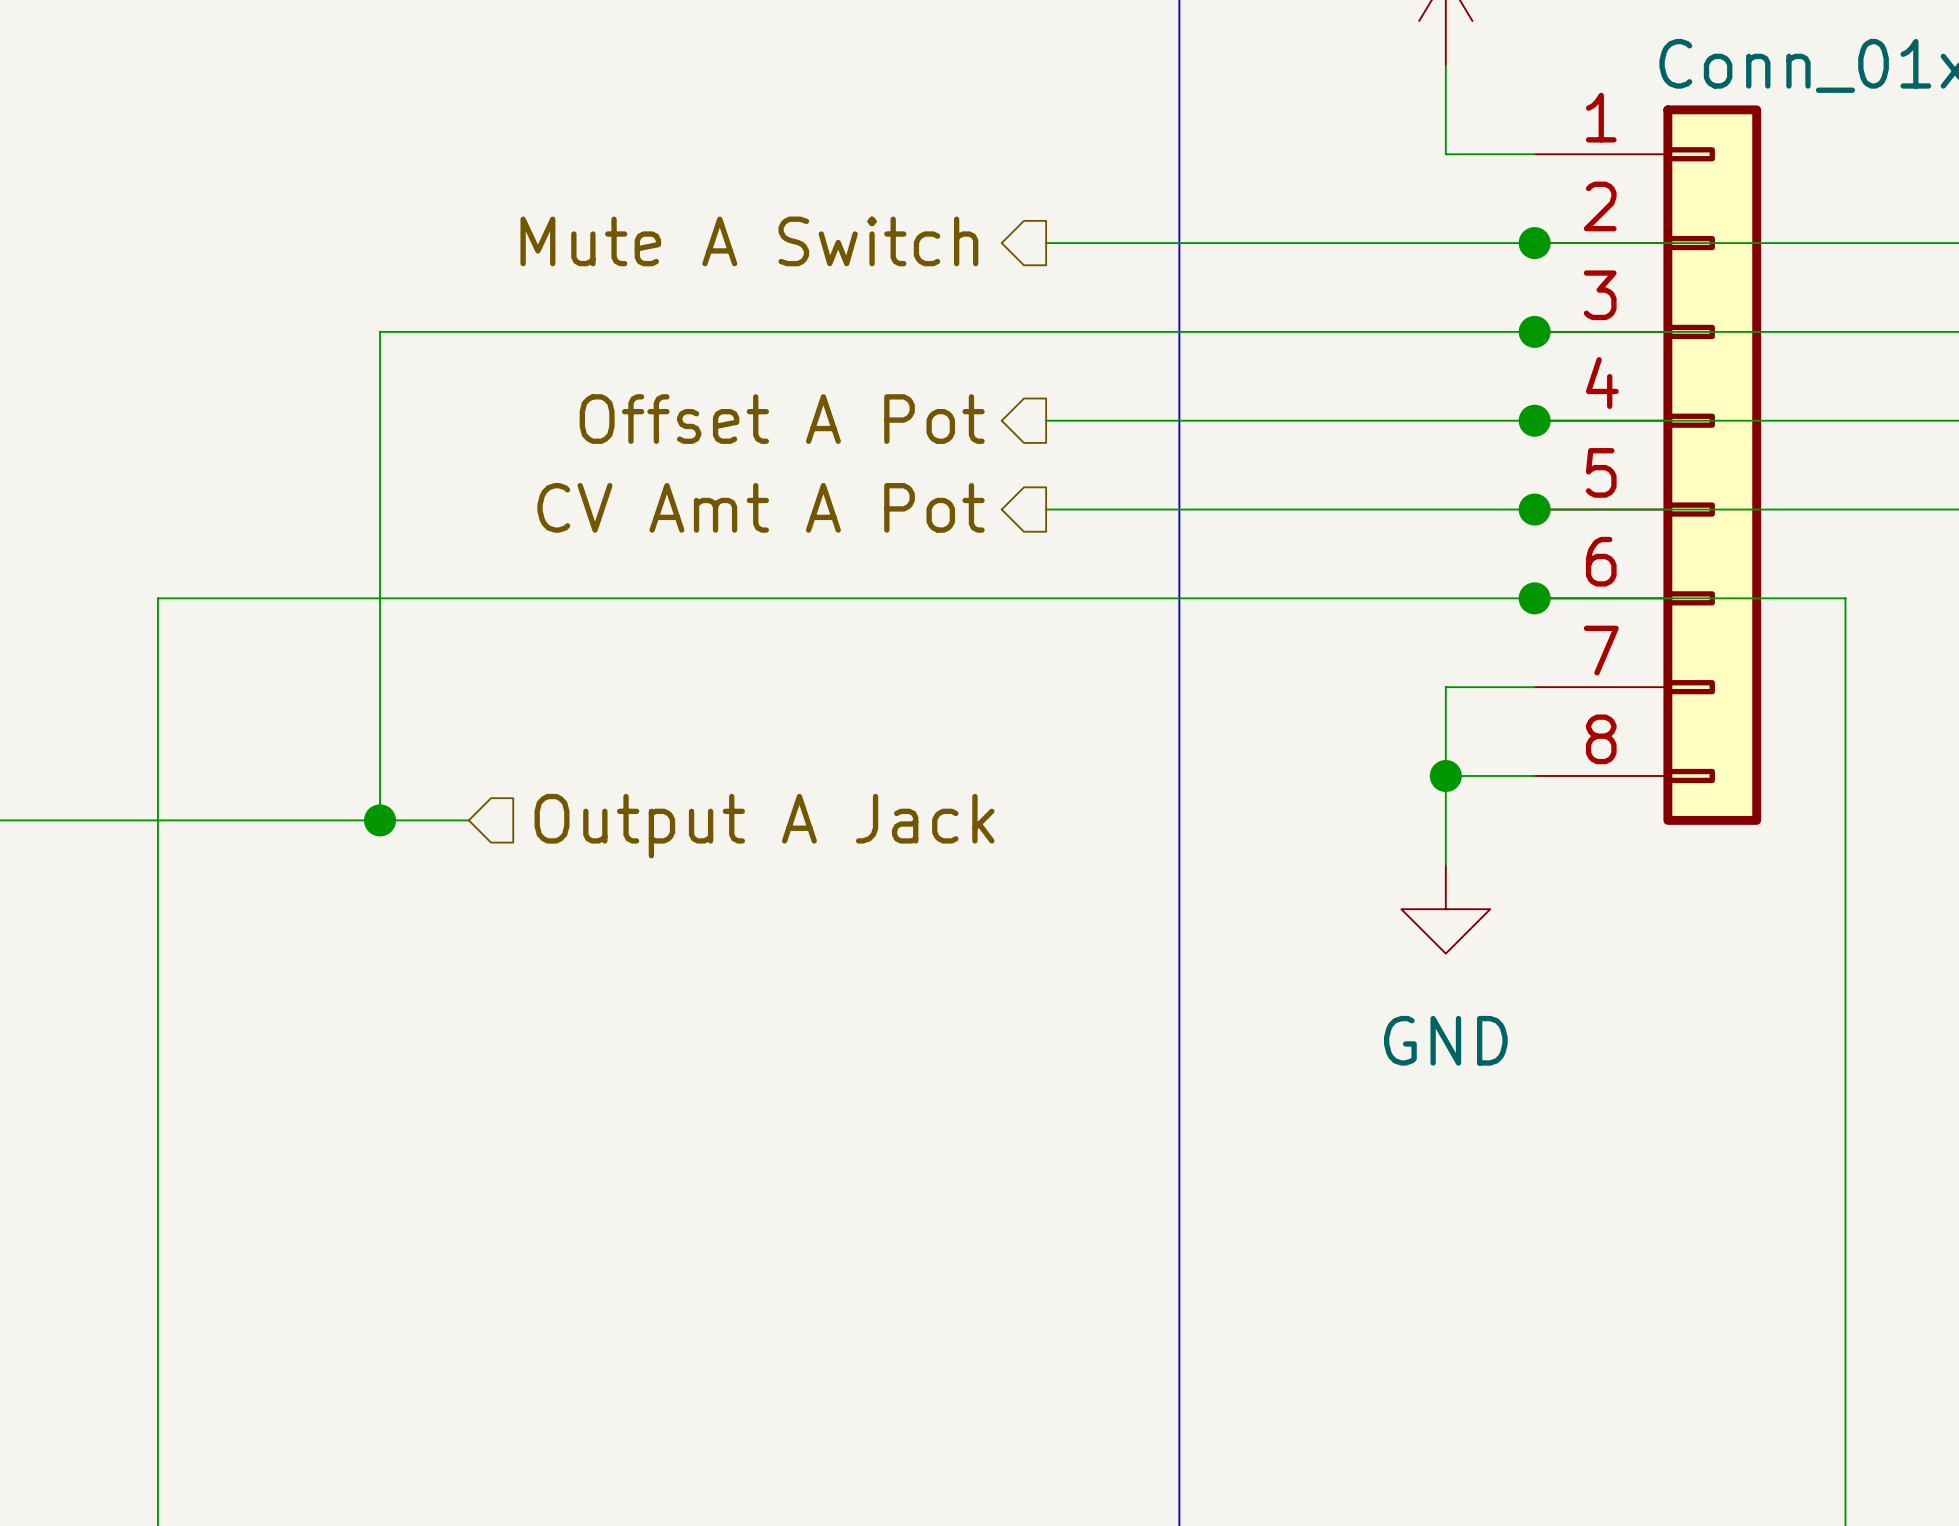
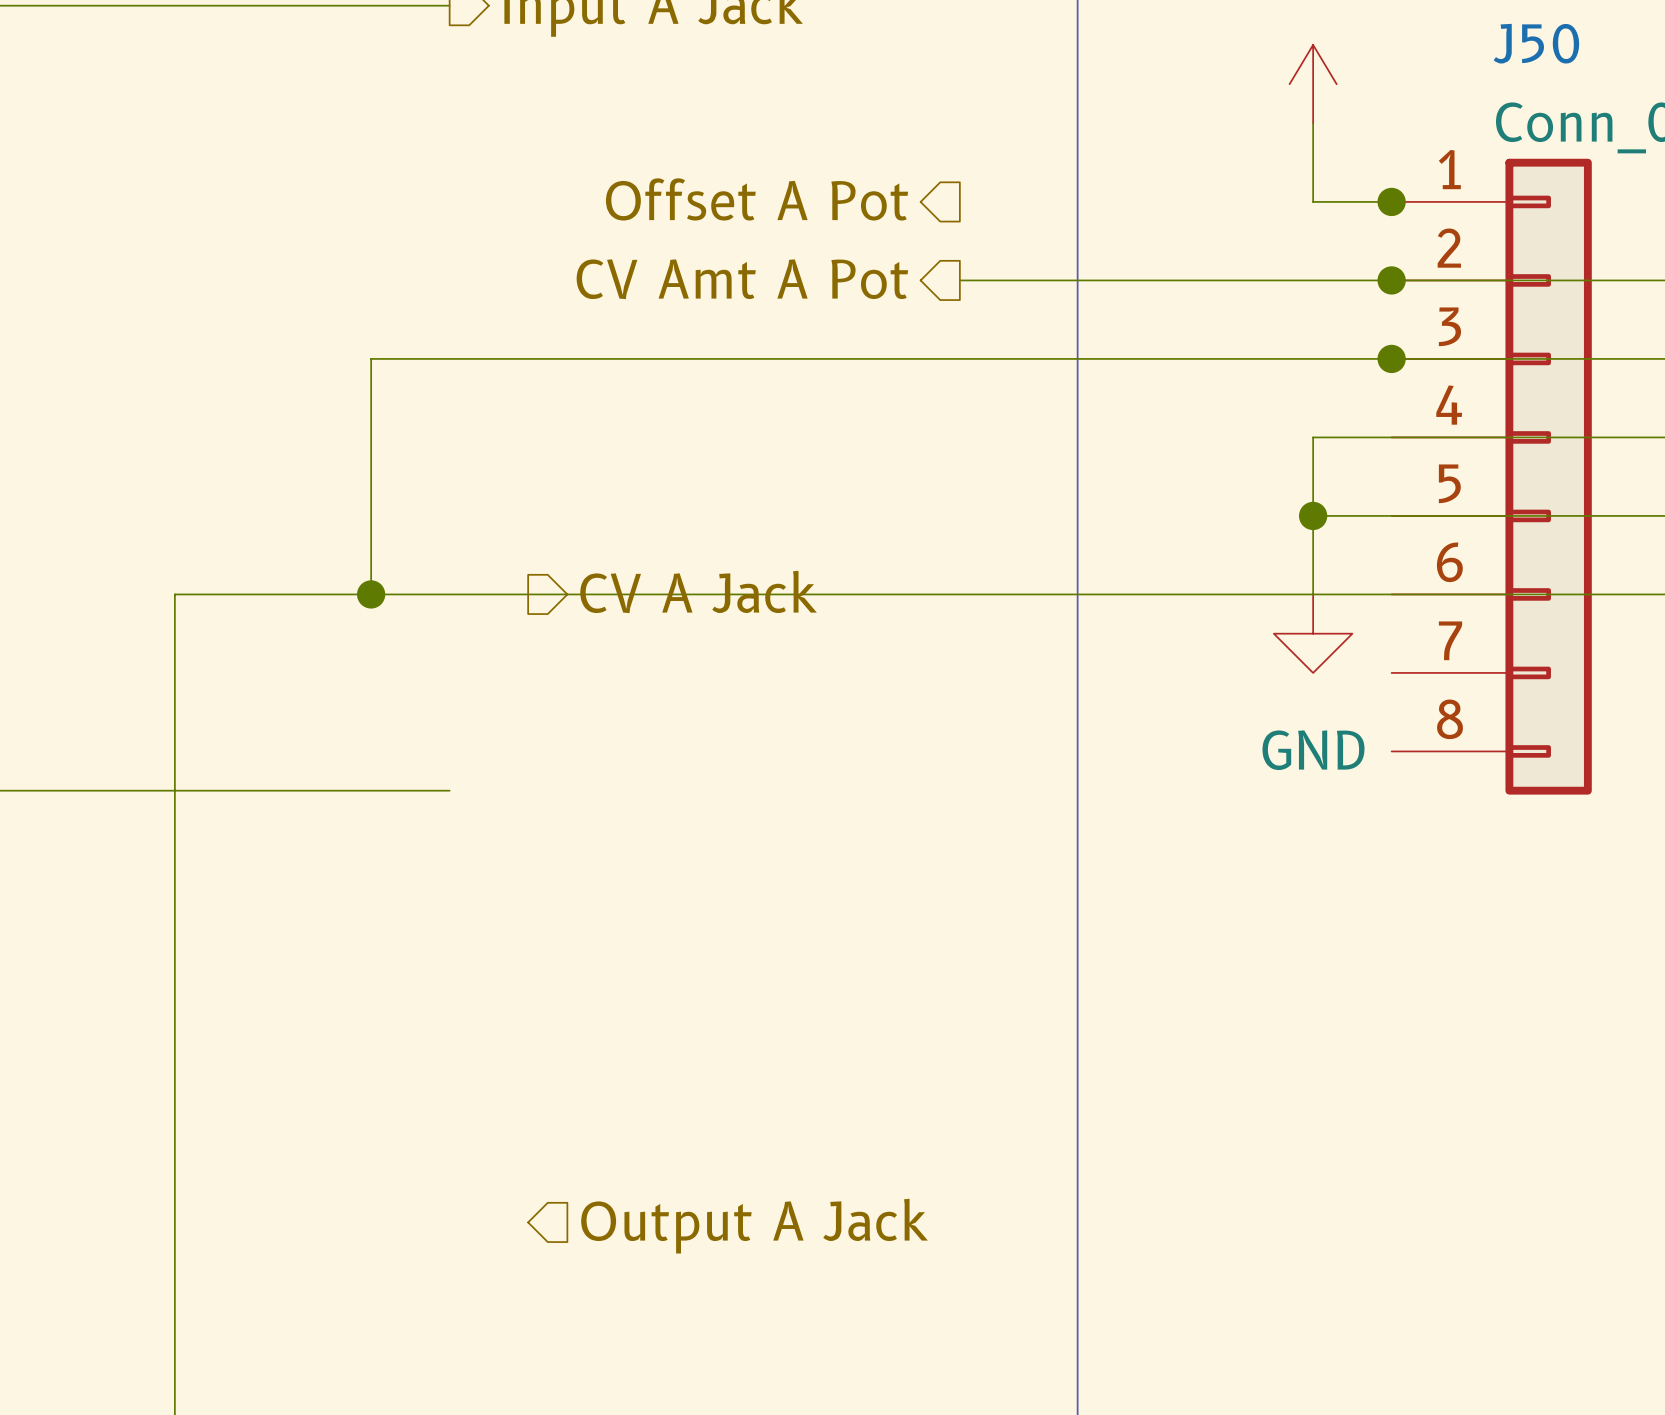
junction: none -> (1391, 201)
hierarchical label: Mute A Switch (749, 241) -> CV Amt A Pot (742, 279)
hierarchical label position: Offset A Pot (782, 419) -> Offset A Pot (757, 199)
wire: (1046, 420) (1445, 420) -> (1313, 594) (1313, 437)
junction: (1534, 420) -> none
hierarchical label: CV Amt A Pot (761, 507) -> none
wire: (1046, 509) (1445, 509) -> none
junction: none -> (1313, 515)
junction: (1534, 509) -> none
hierarchical label: none -> CV A Jack (698, 591)
wire: (380, 598) (380, 820) -> none
junction: none -> (371, 594)
junction: (1534, 598) -> none
wire: (1534, 687) (1445, 687) (1445, 864) -> none
wire: (1445, 775) (1534, 775) -> none
junction: (1445, 775) -> none
junction: (380, 820) -> none
hierarchical label position: Output A Jack (764, 826) -> Output A Jack (754, 1226)
power symbol position: GND (1445, 909) -> GND (1313, 633)

